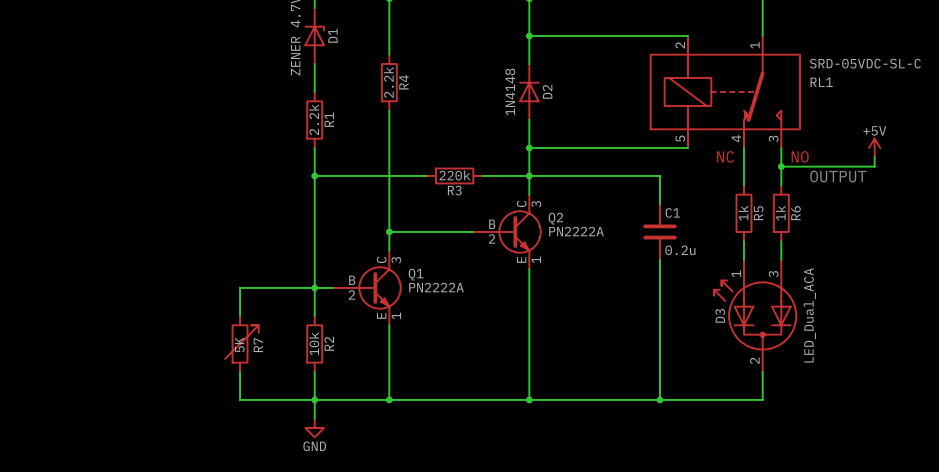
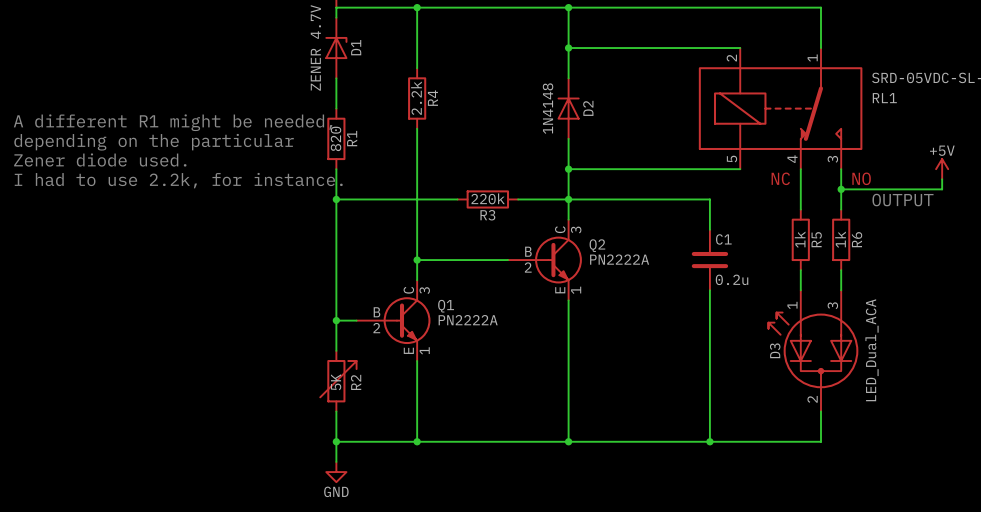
text: none -> A different R1 might be needed, (173, 122)
R1 value: 2.2k (314, 119) -> 820 (336, 138)
text: none -> depending on the particular (154, 142)
text: none -> Zener diode used. (100, 160)
text: none -> I had to use 2.2k, for instance. (178, 180)
wire: (314, 287) (240, 287) (240, 315) -> none
R2 symbol: [306, 315, 324, 372] -> [320, 350, 357, 412]
R7: 5K (241, 343) -> none
R2 value: 10k (314, 343) -> 5K (336, 382)
wire: (240, 371) (240, 399) (314, 399) -> none

